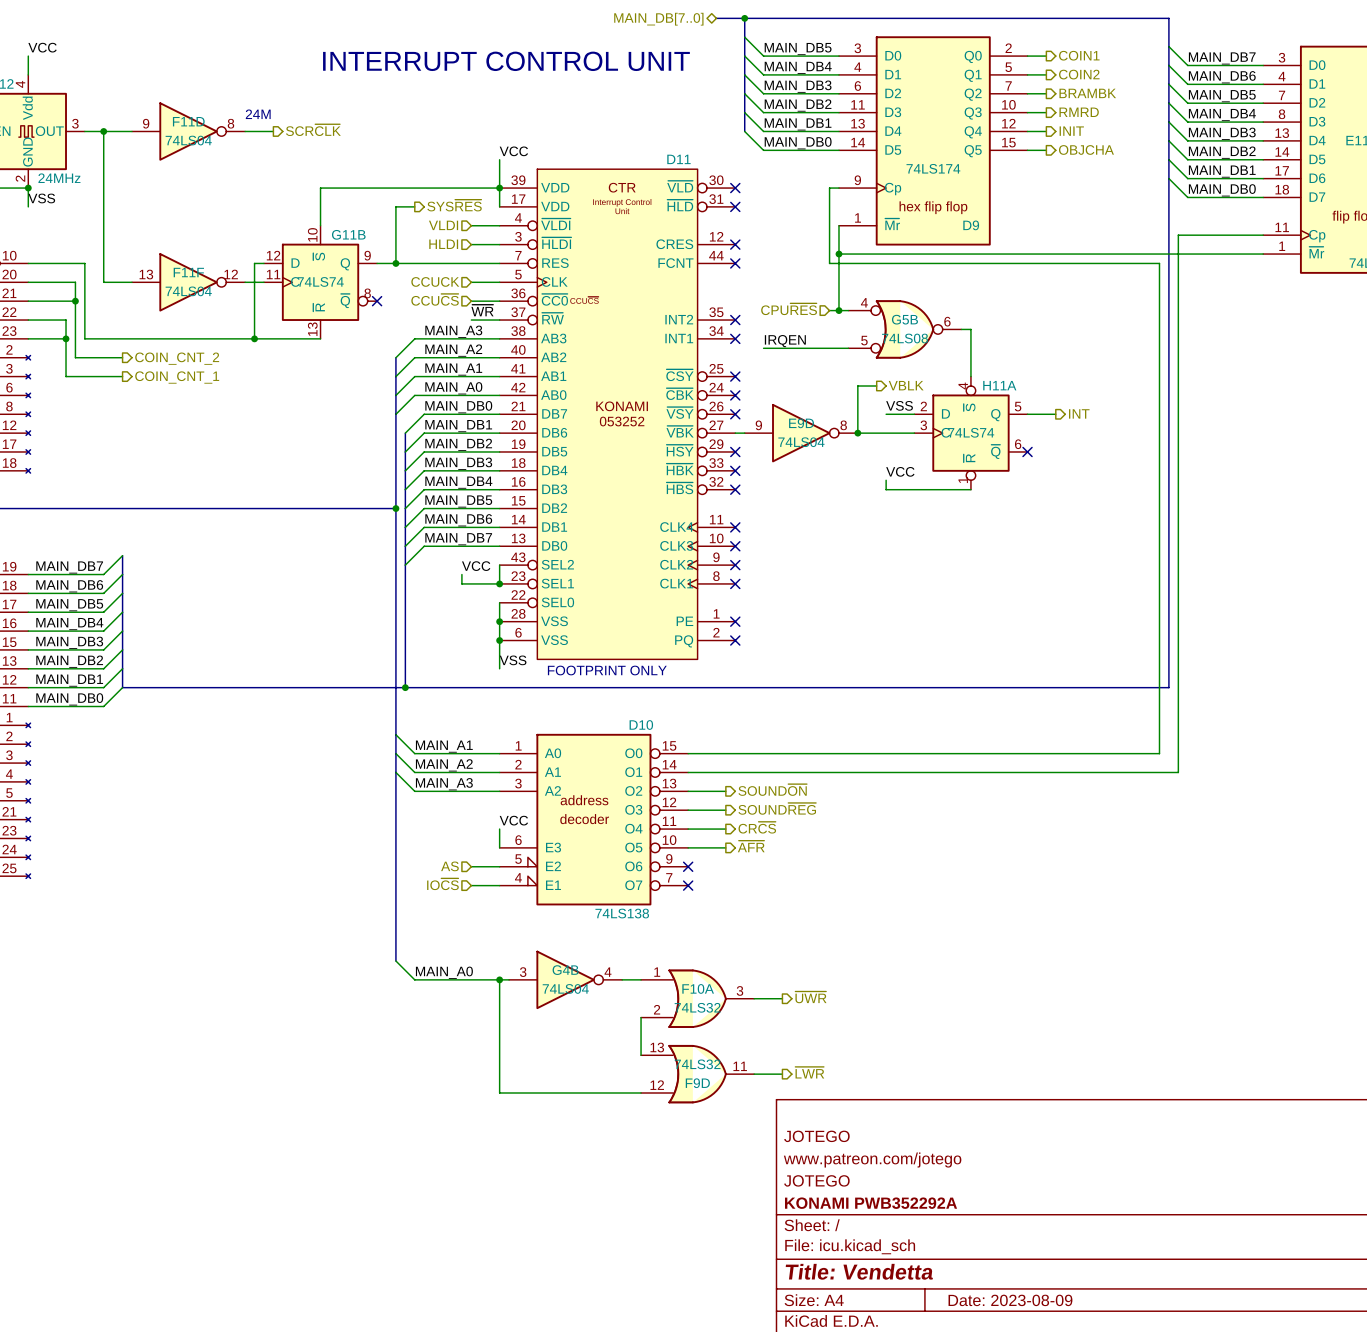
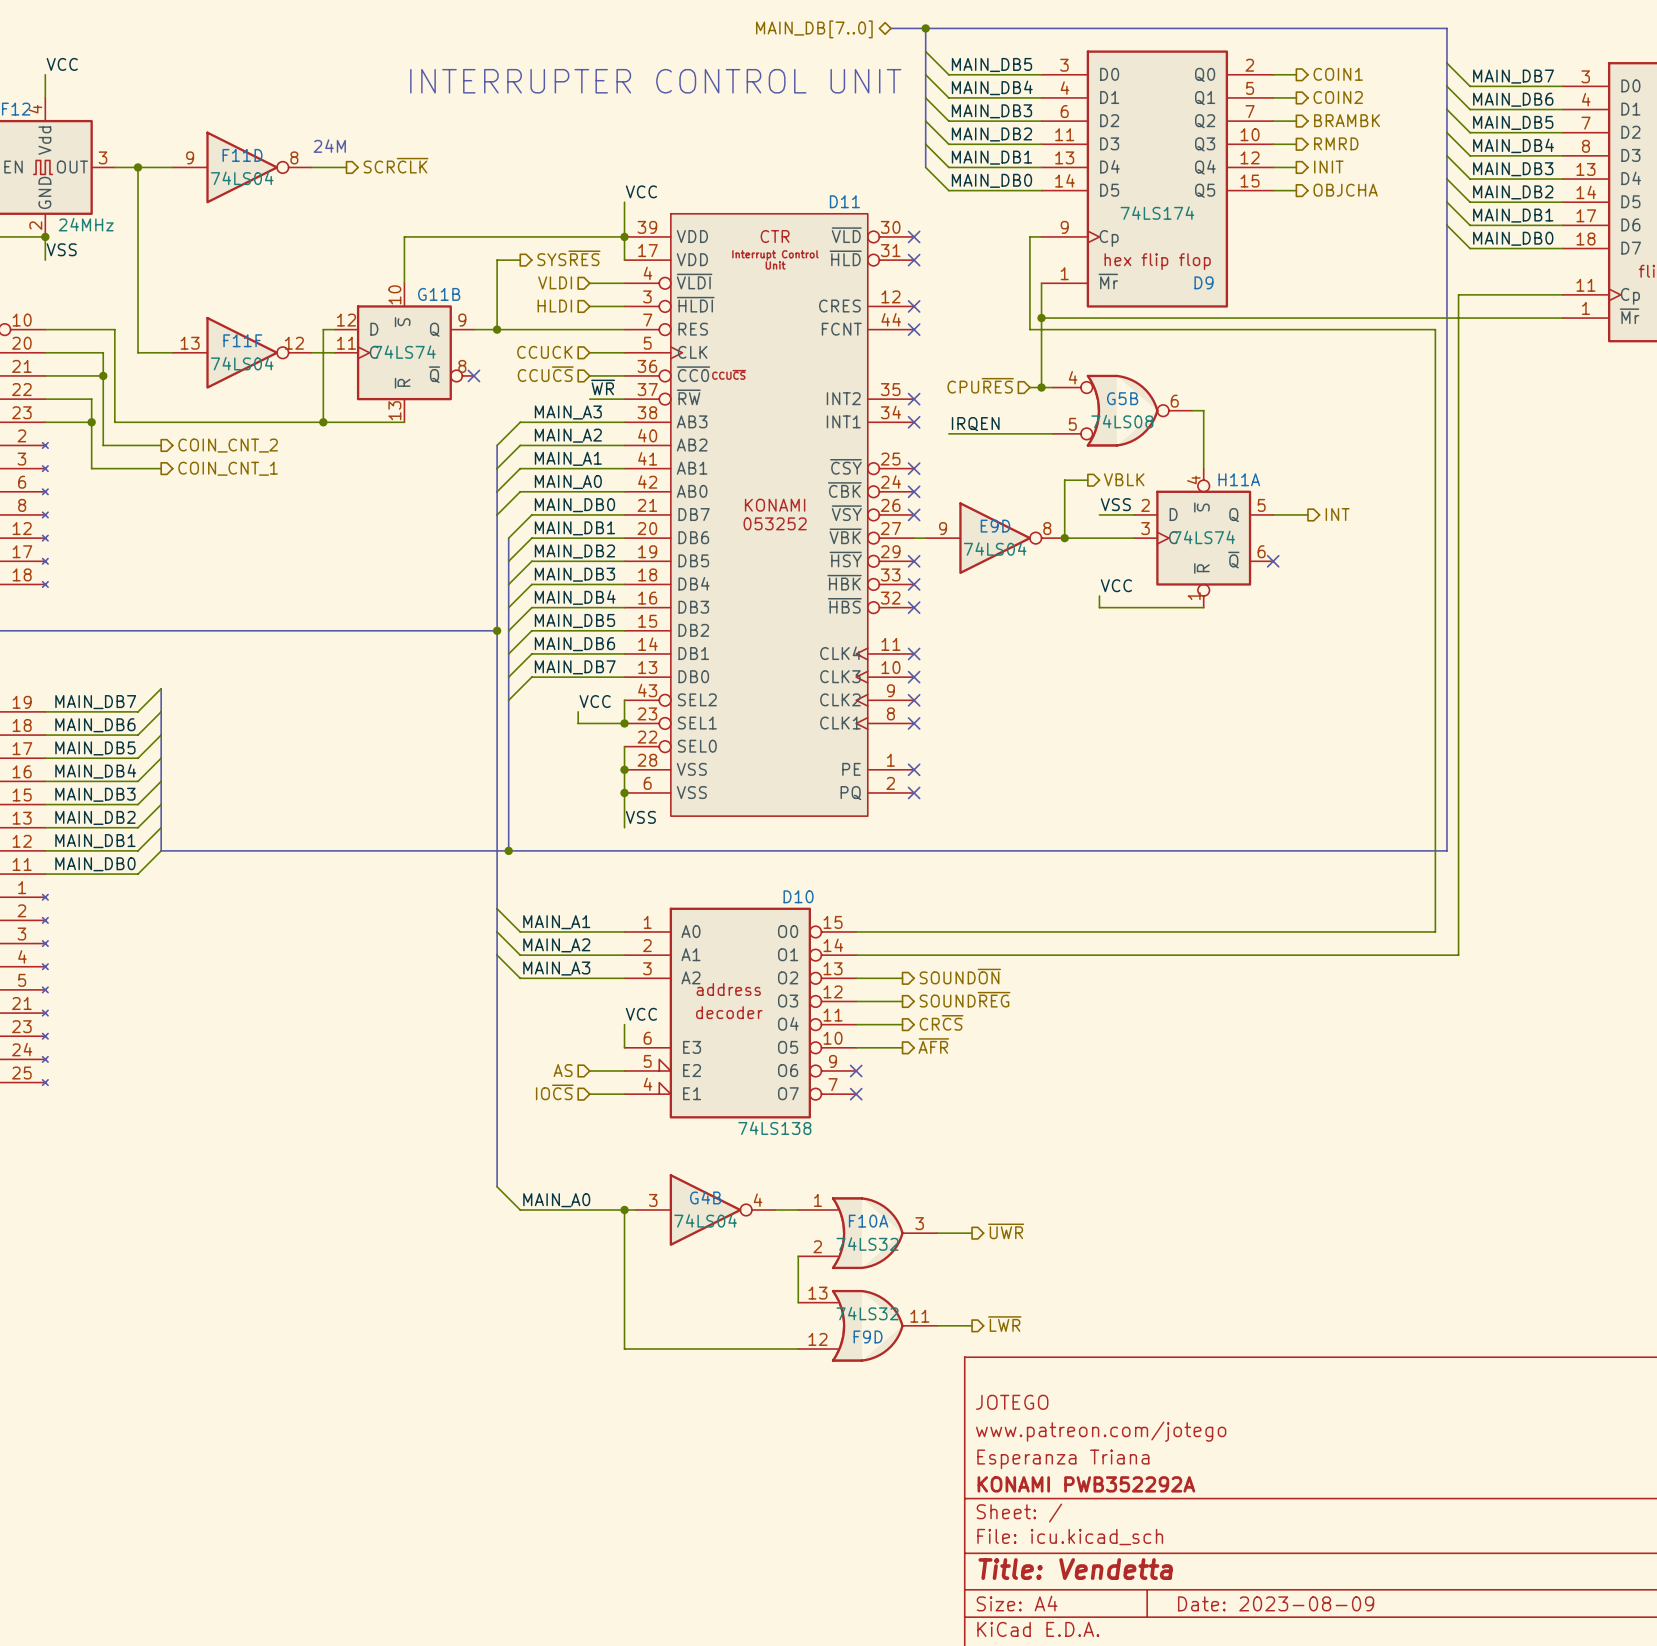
text: INTERRUPT CONTROL UNIT (506, 61) -> INTERRUPTER CONTROL UNIT (655, 81)
text: FOOTPRINT ONLY (607, 670) -> none
title block: JOTEGO (816, 1180) -> Esperanza Triana (1063, 1459)

